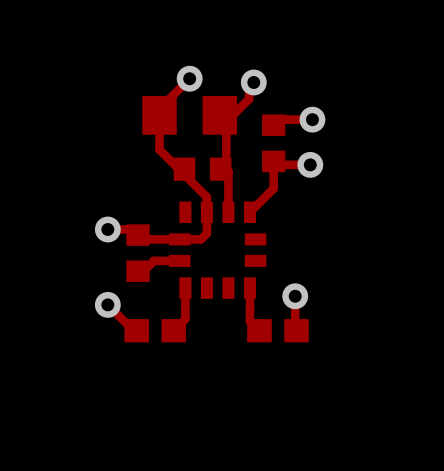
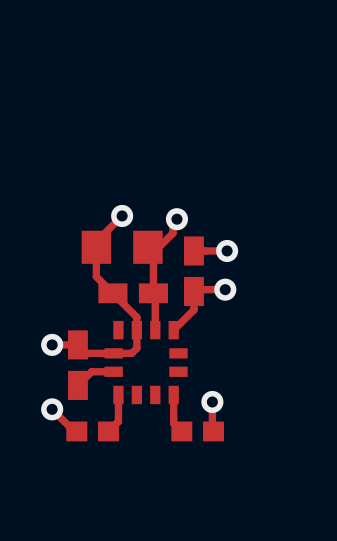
part footprint: [262, 114, 286, 173] -> [184, 236, 204, 307]
part footprint: [173, 157, 232, 181] -> [98, 283, 168, 304]
part footprint: [126, 224, 150, 283] -> [67, 330, 88, 400]

